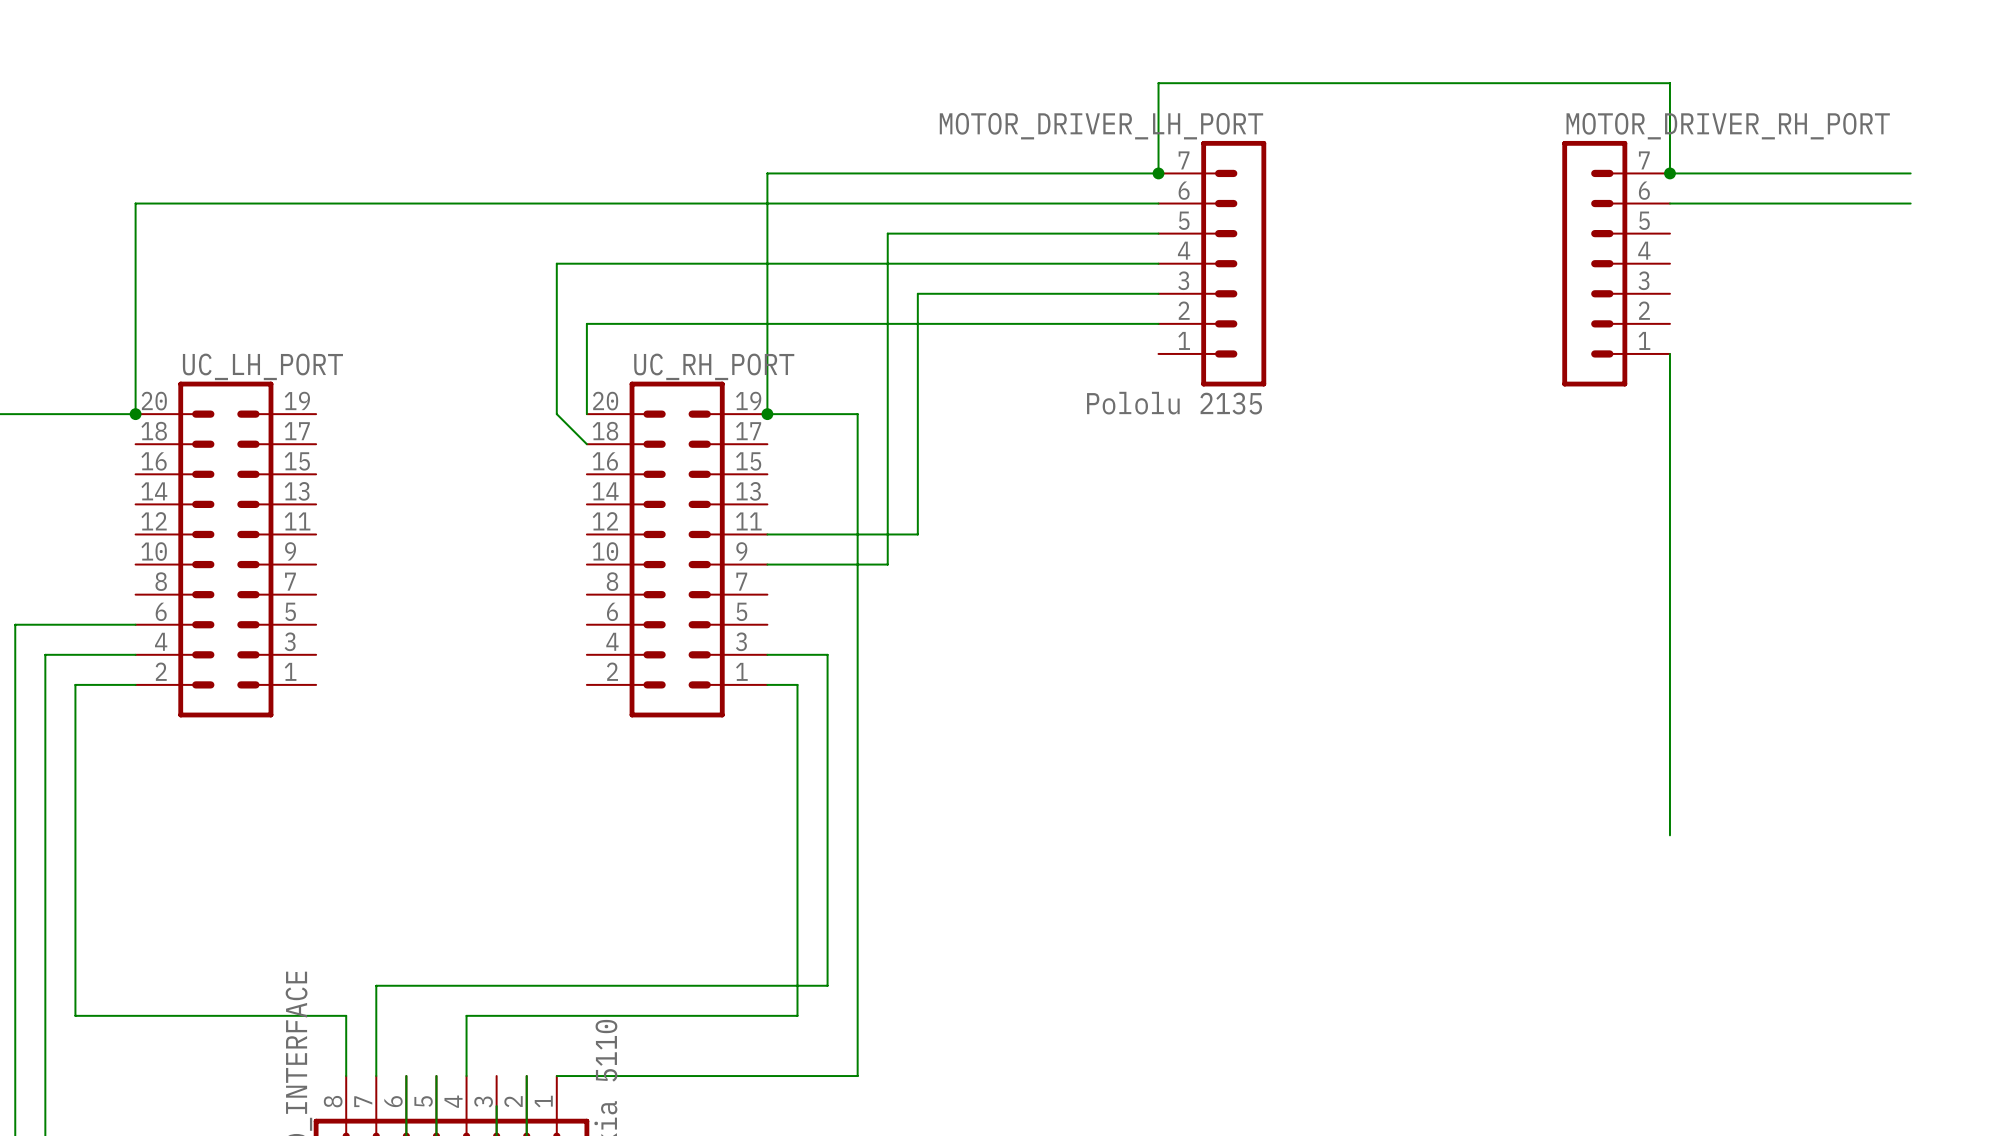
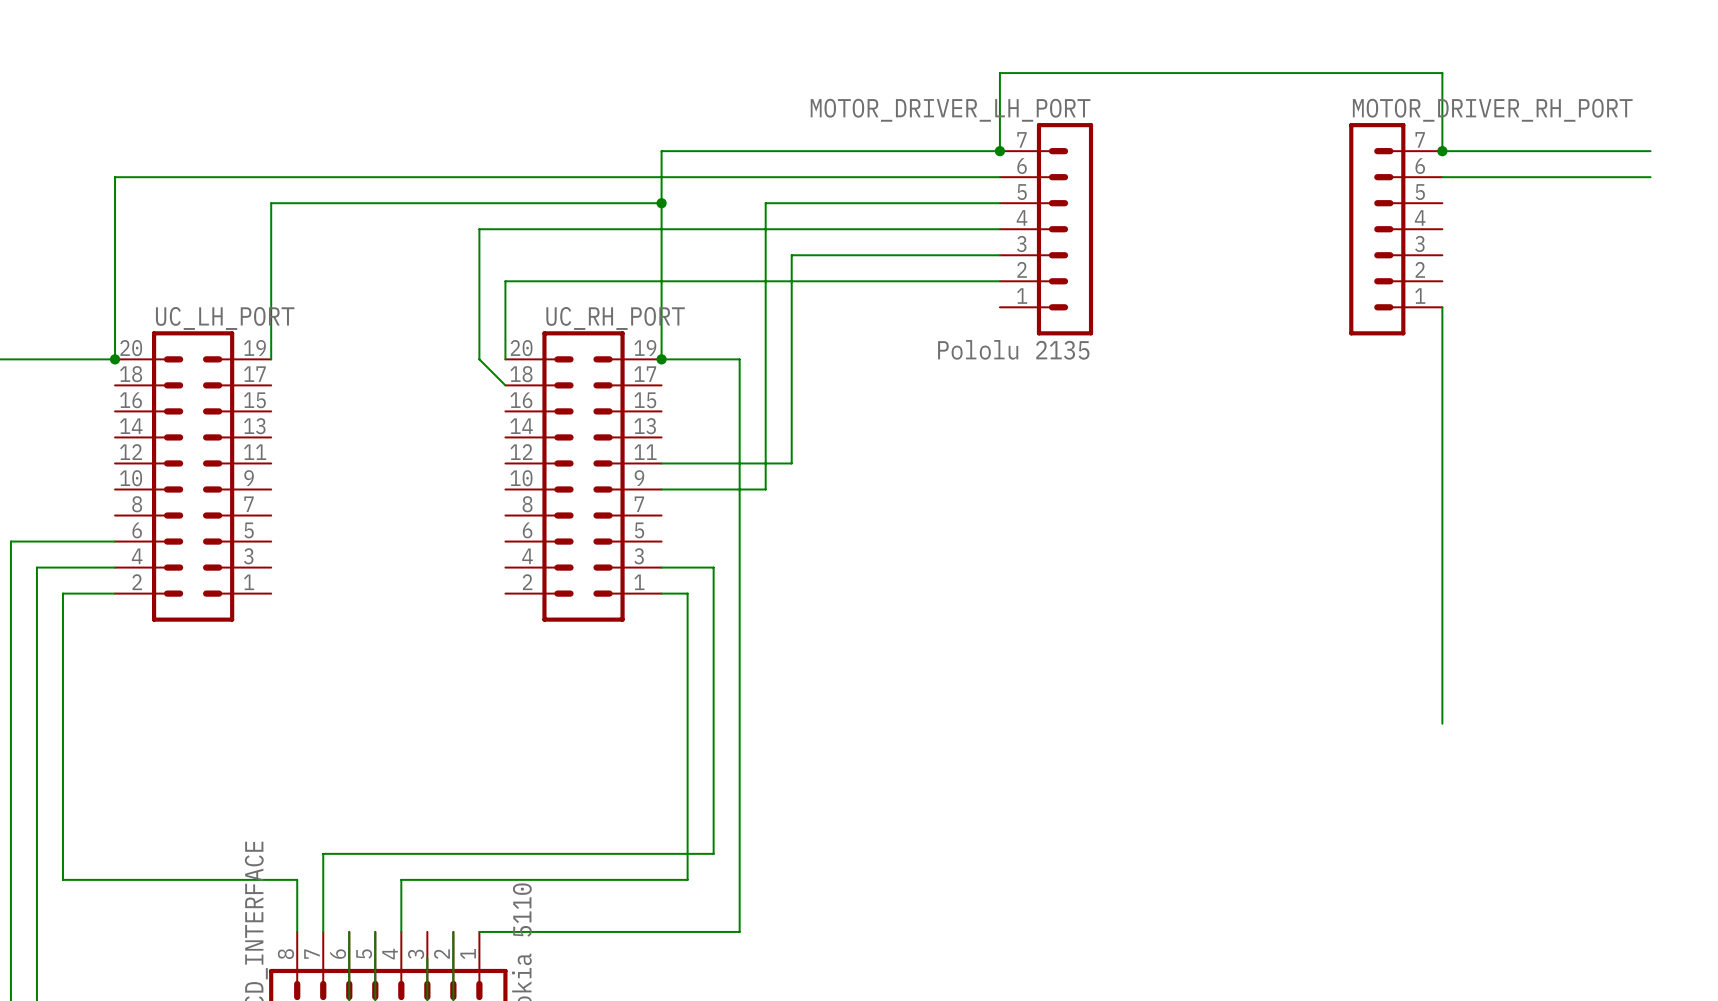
wire: none -> (661, 203) (271, 203) (271, 359)
junction: none -> (661, 203)

